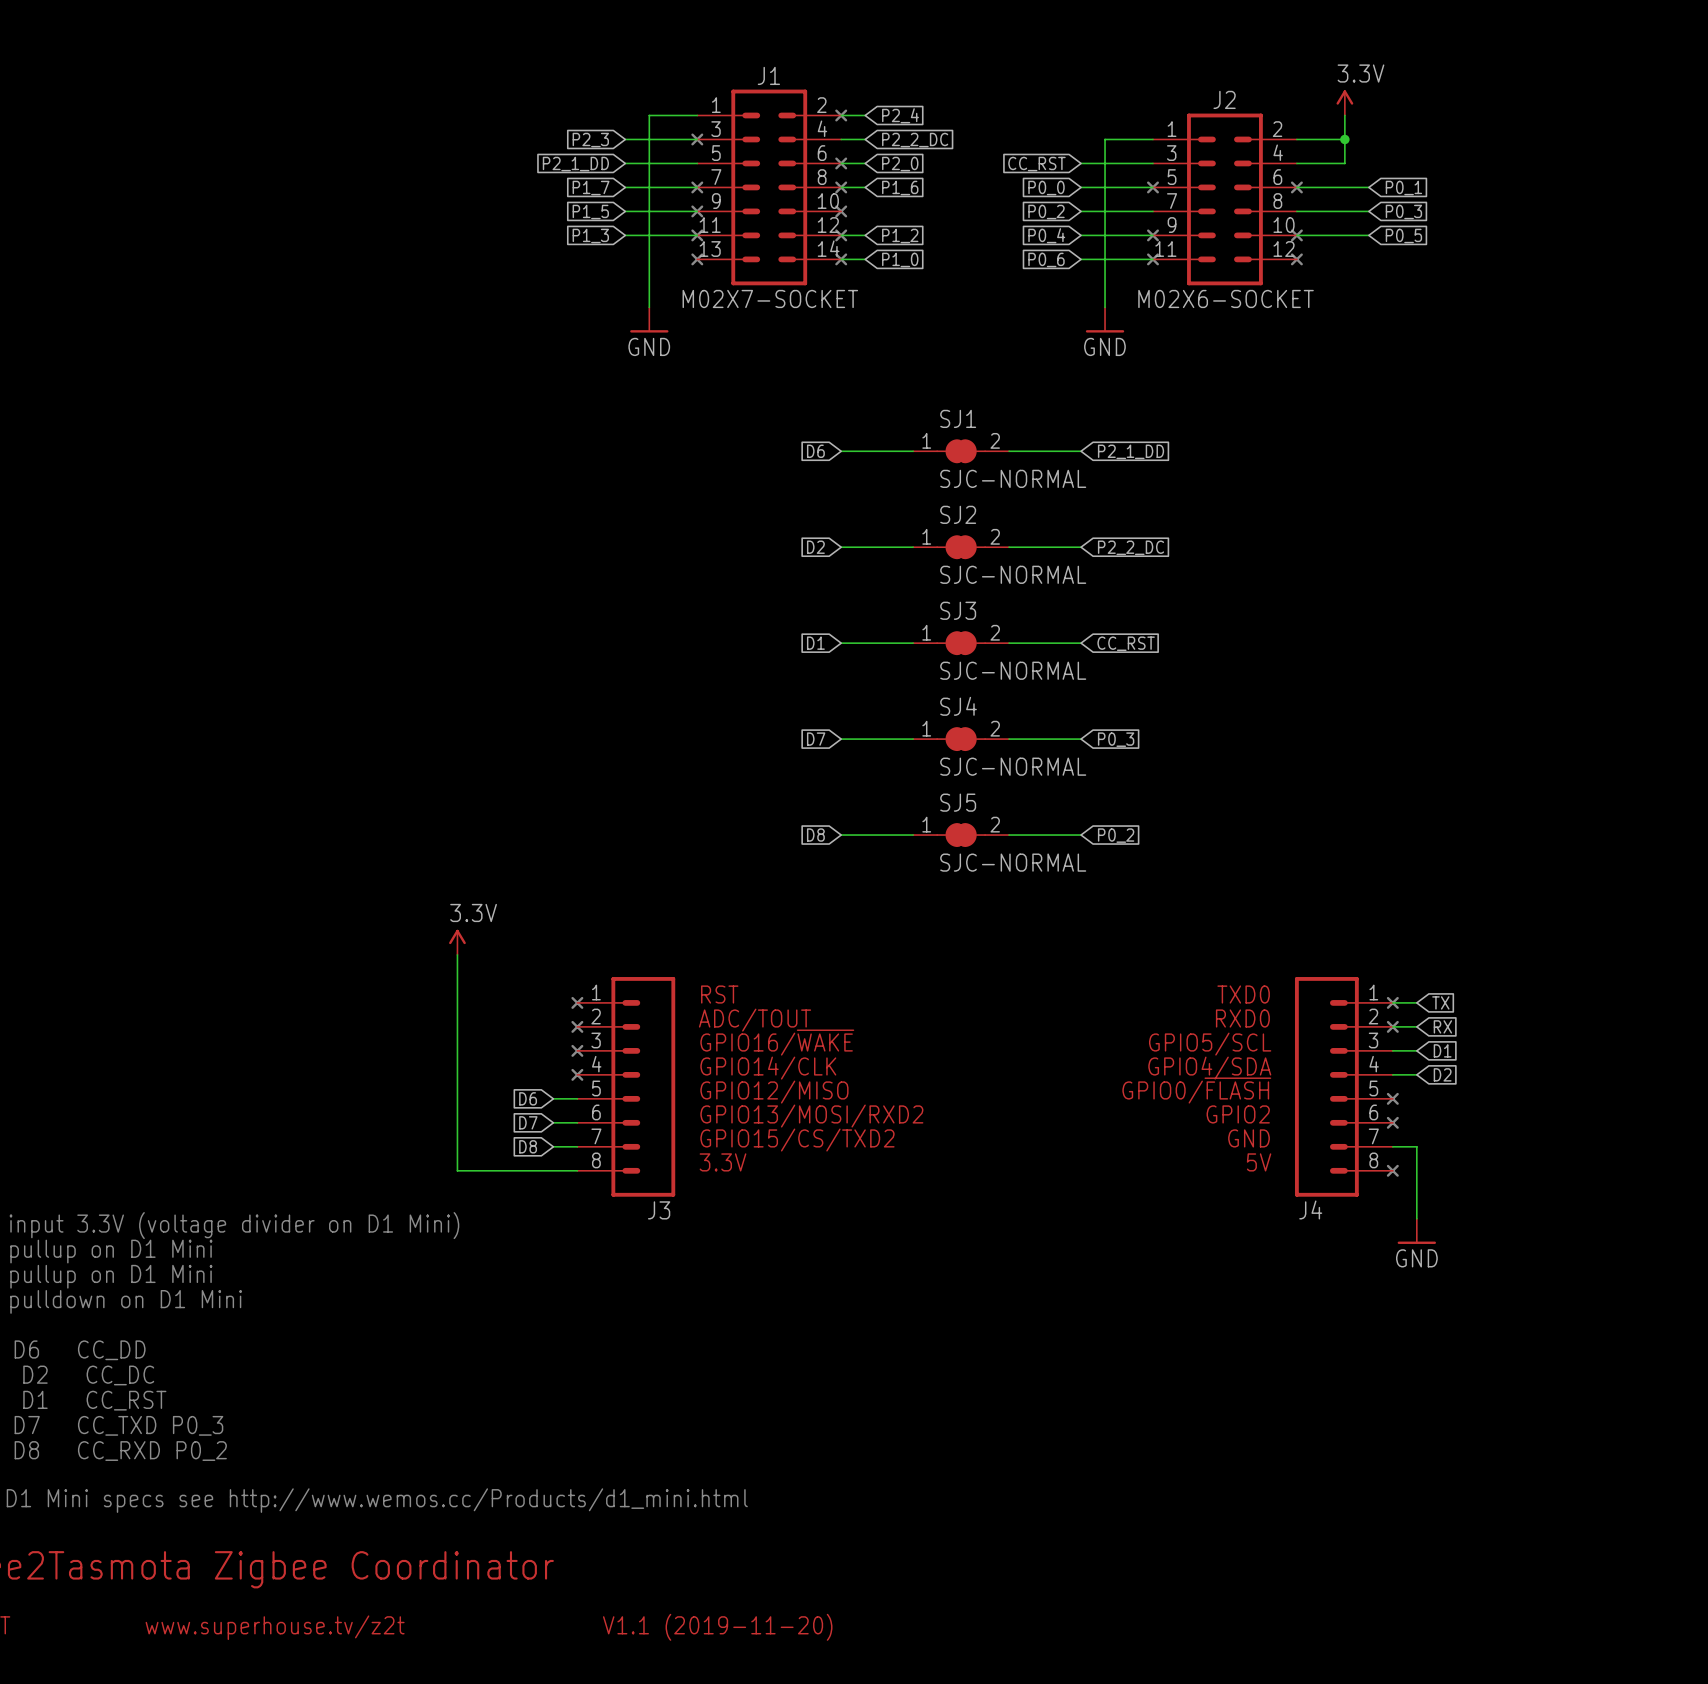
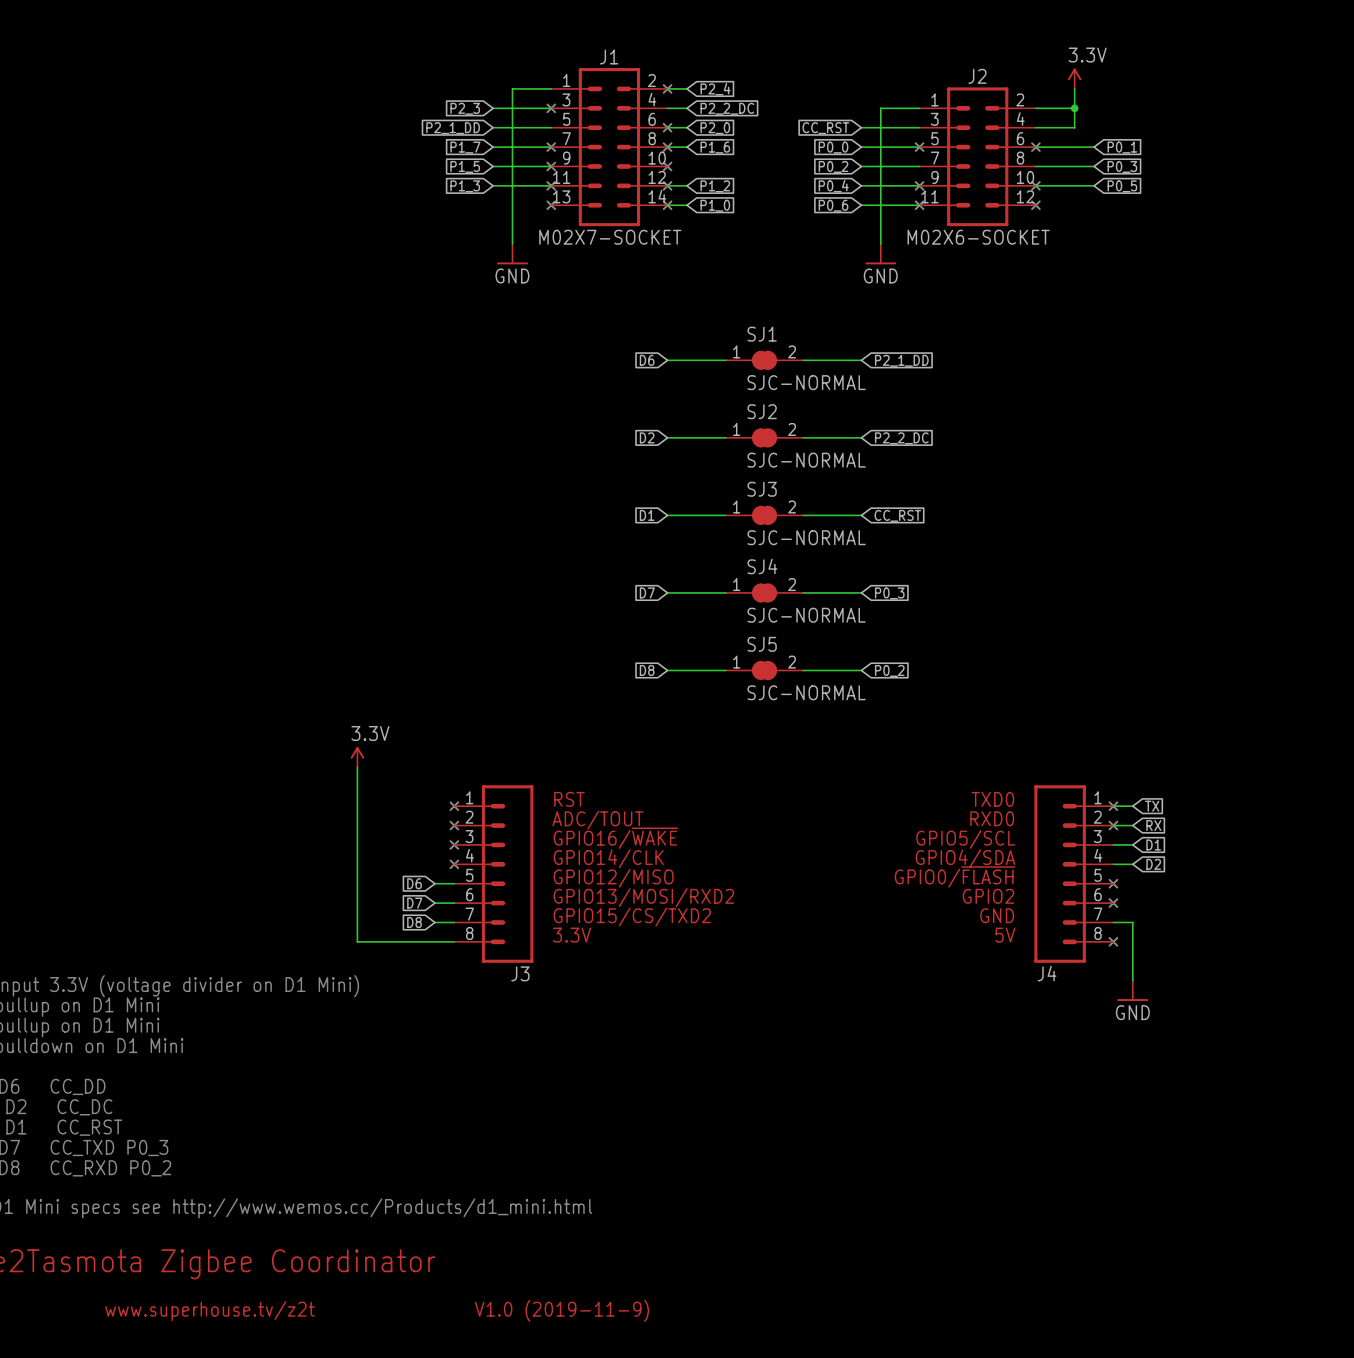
text: V1.1 (2019-11-20) (717, 1627) -> V1.0 (2019-11-9) (561, 1310)

